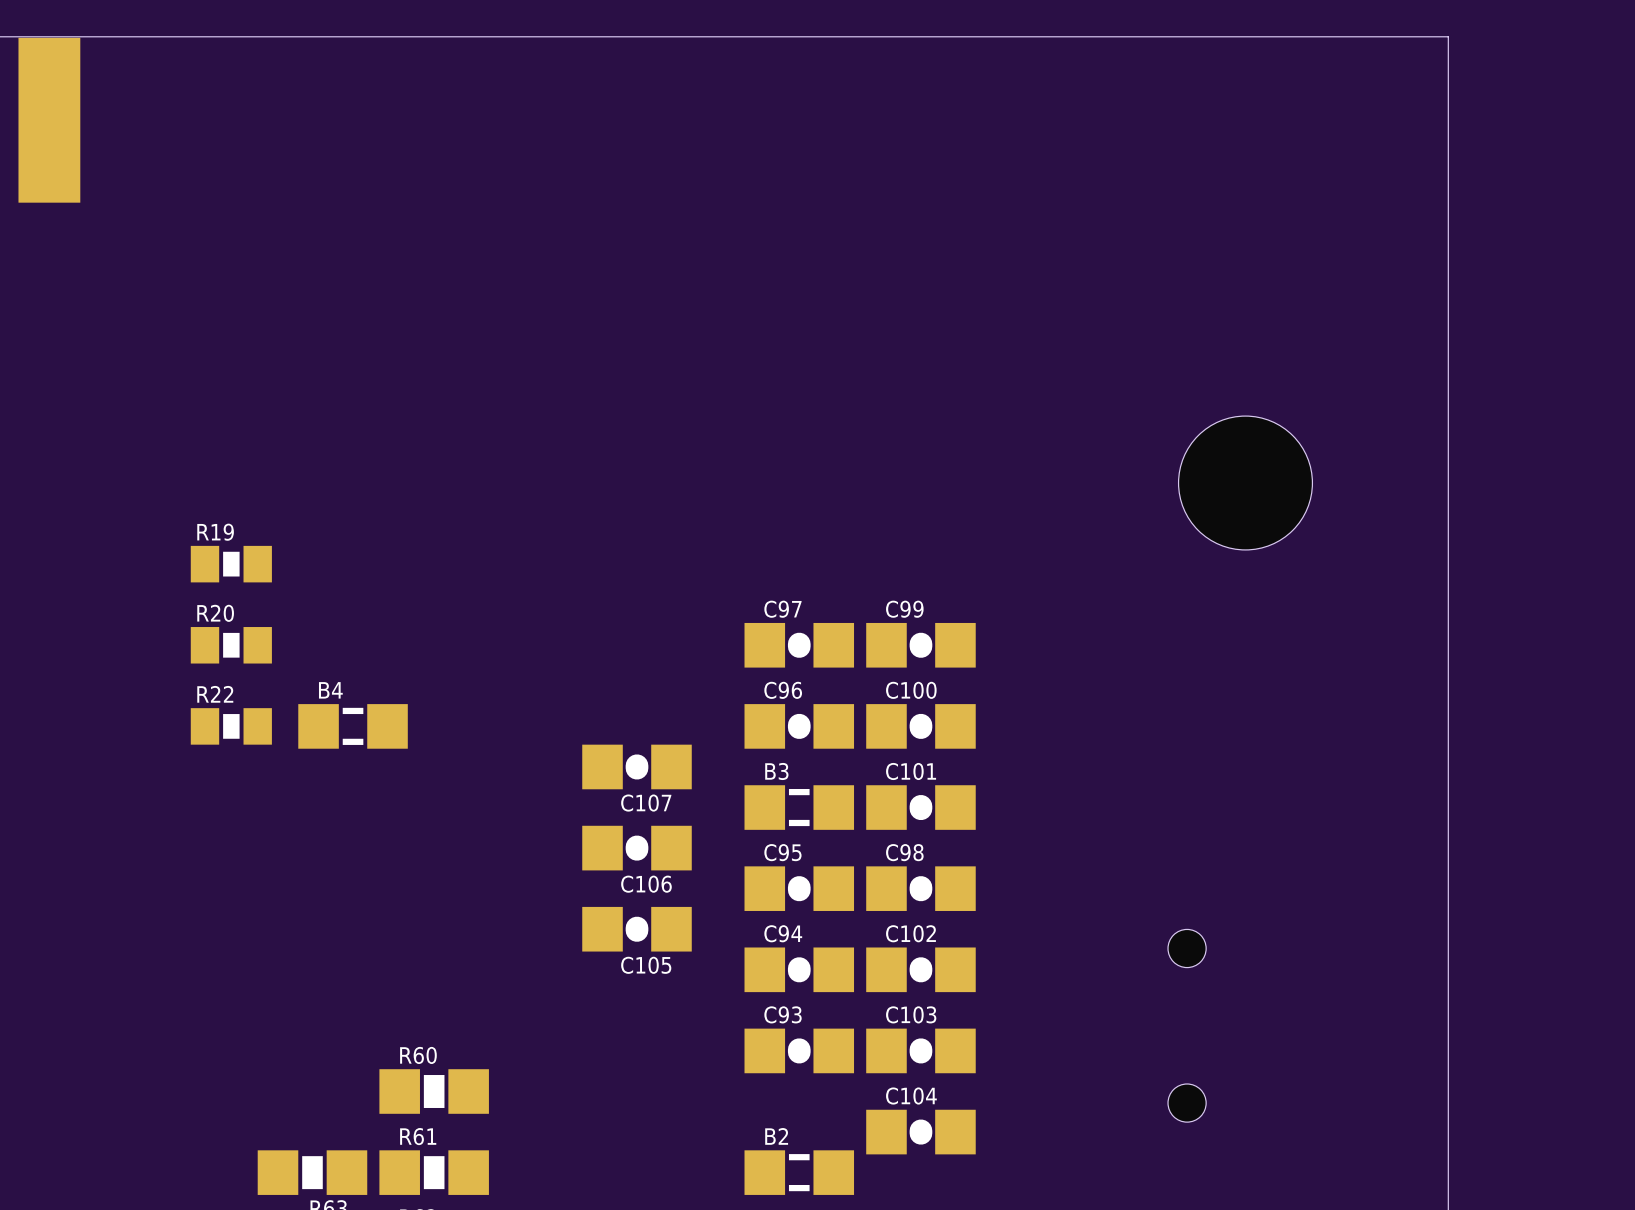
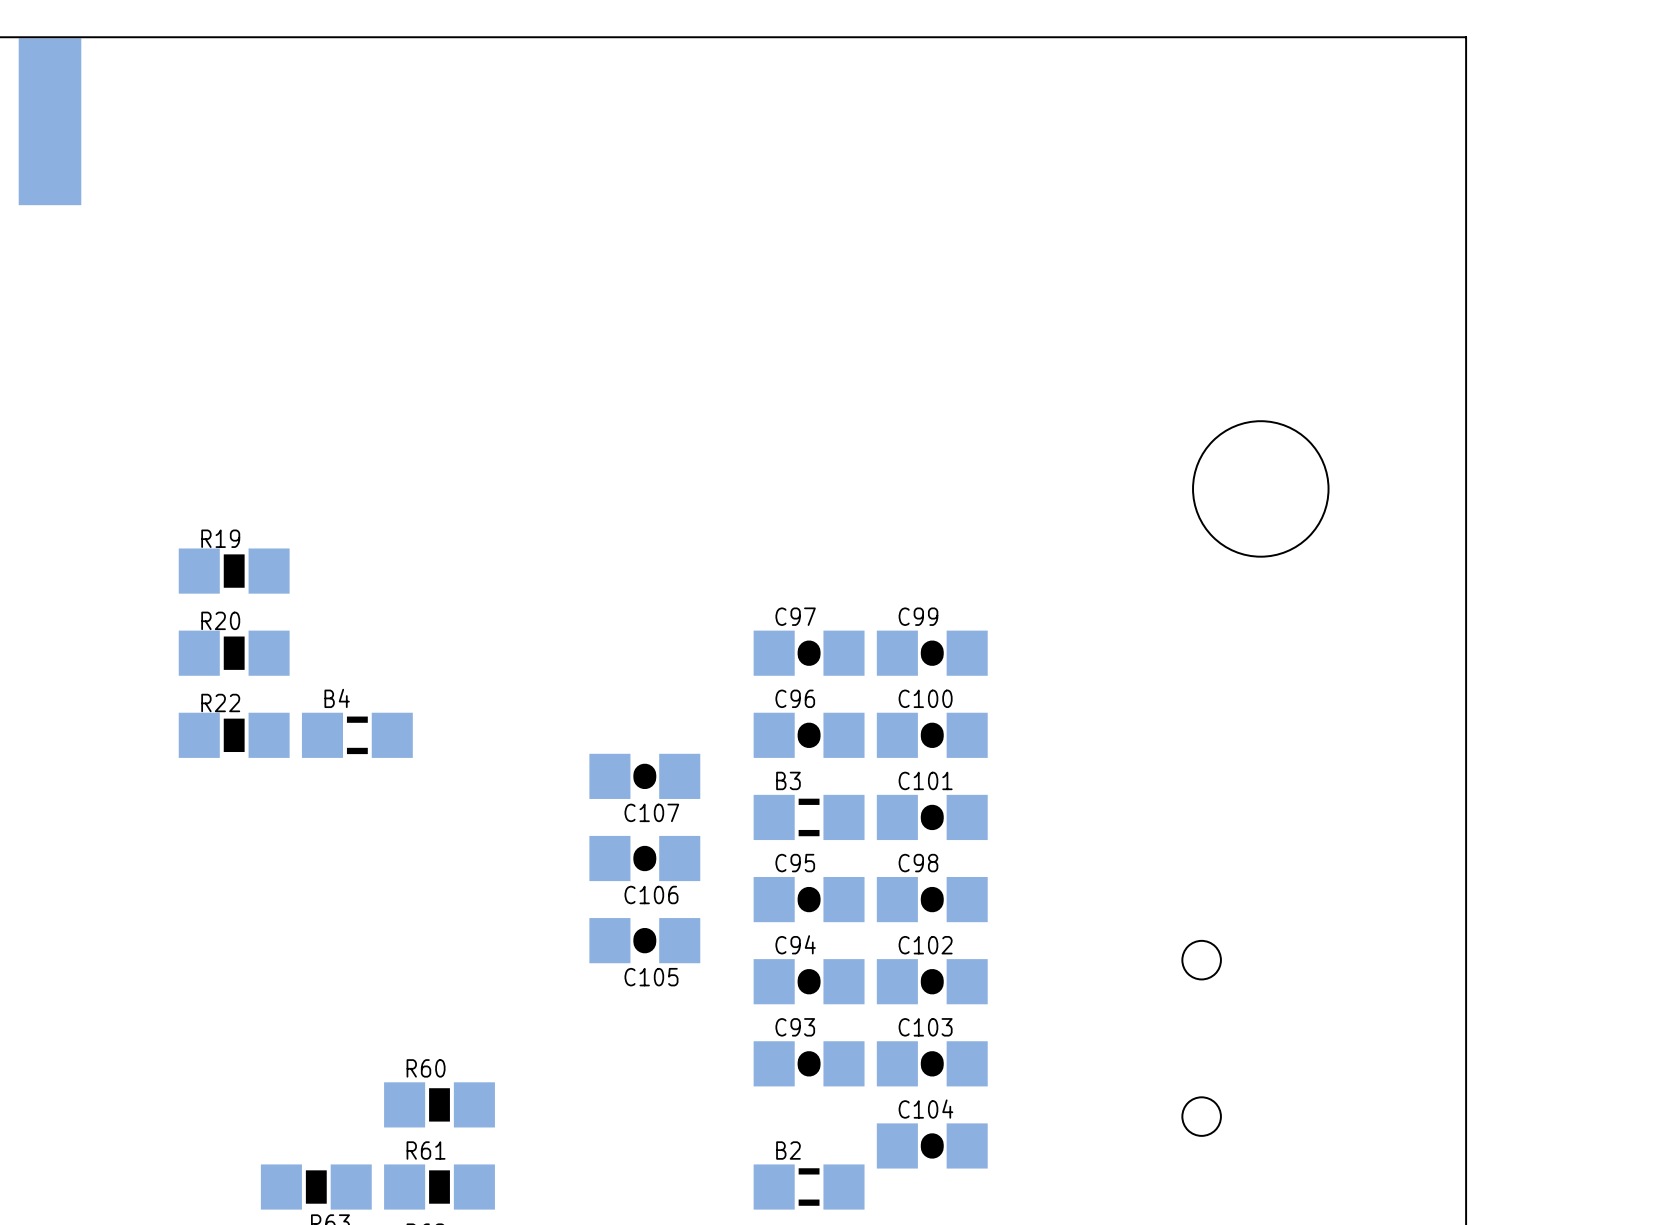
R19 footprint: [190, 545, 272, 583] -> [178, 548, 290, 594]
R20 footprint: [190, 627, 272, 664] -> [178, 630, 290, 676]
R22 footprint: [190, 708, 272, 745] -> [178, 712, 290, 758]

